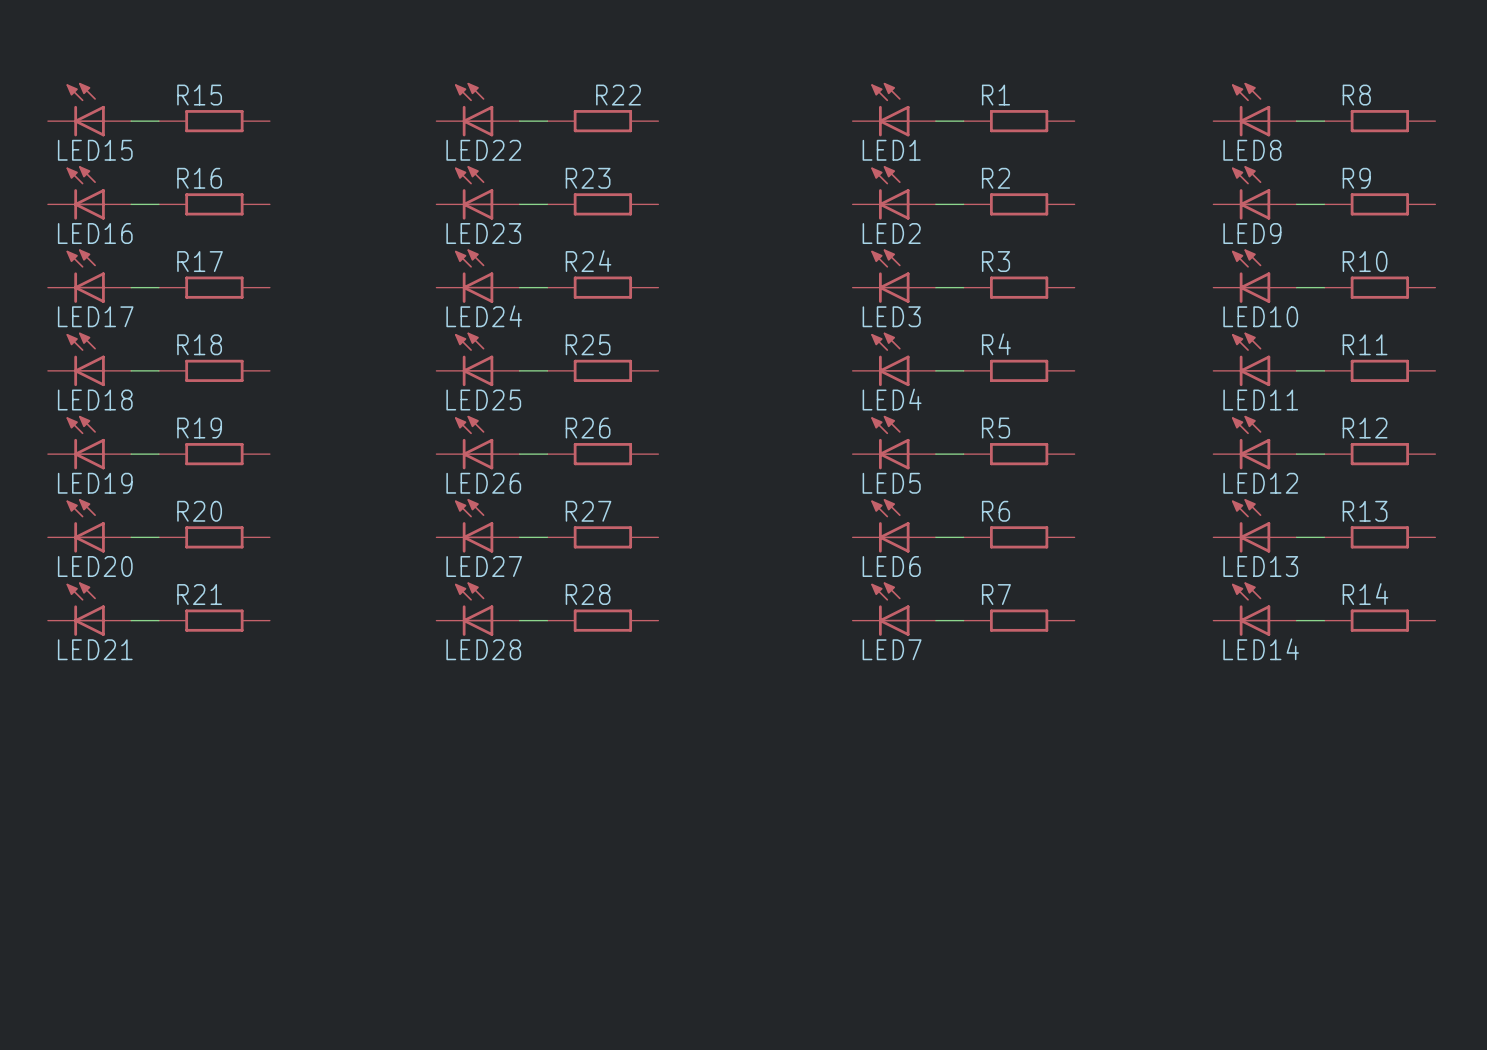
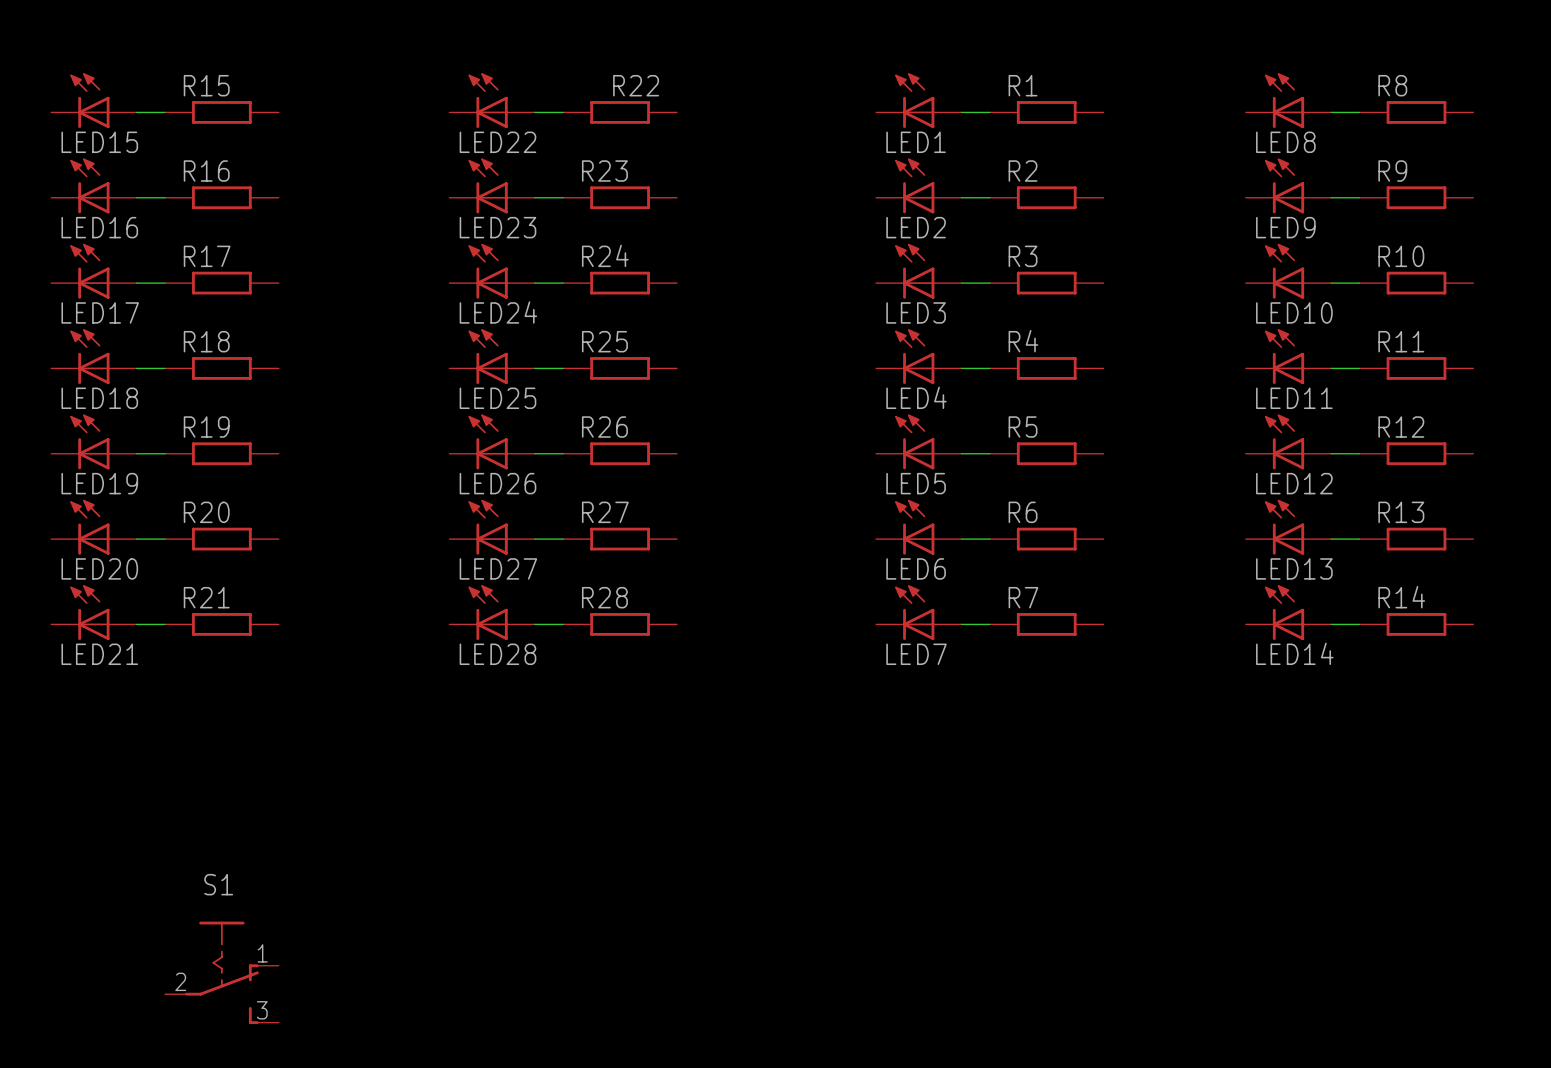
S1: none -> (221, 972)

